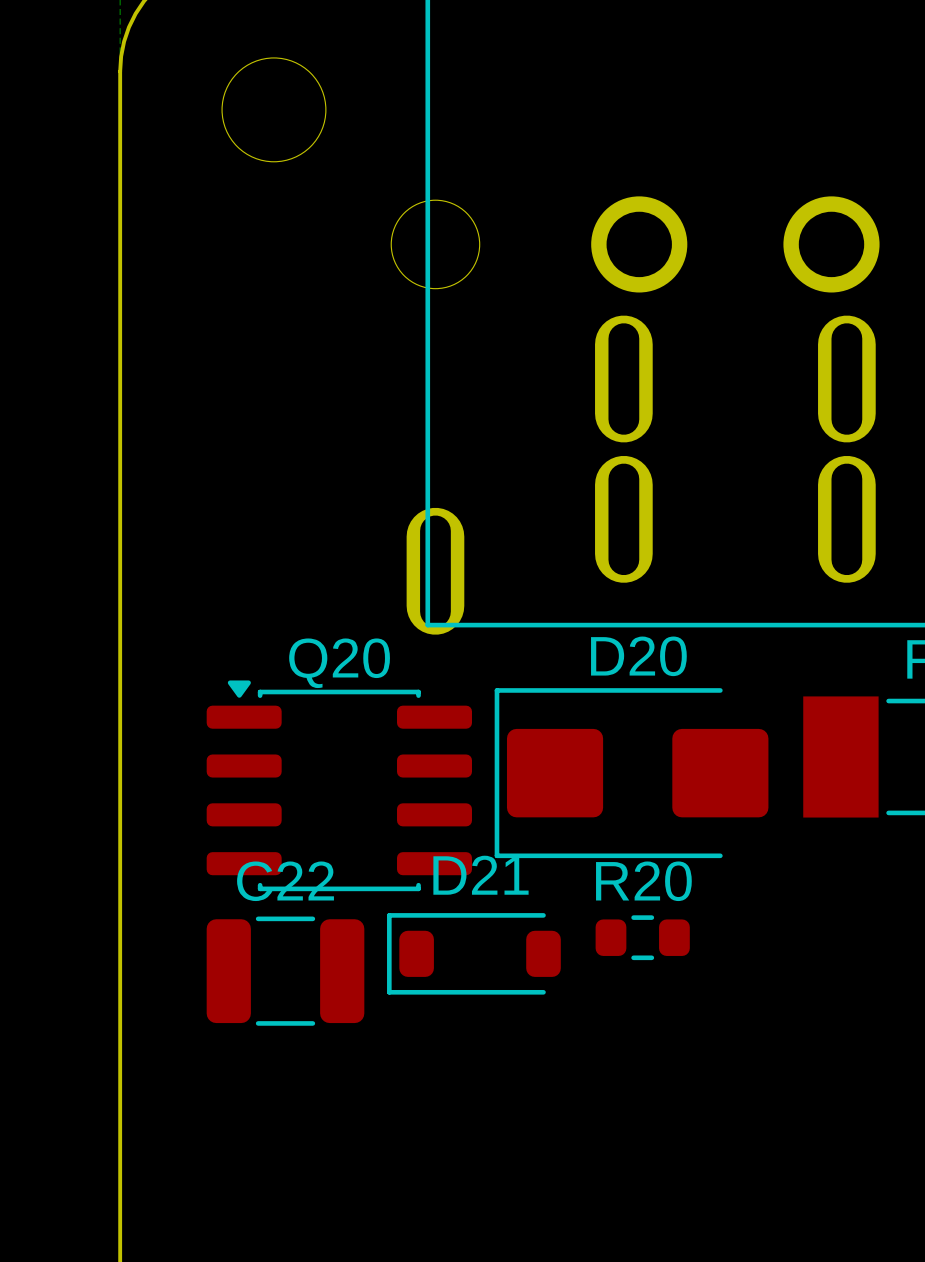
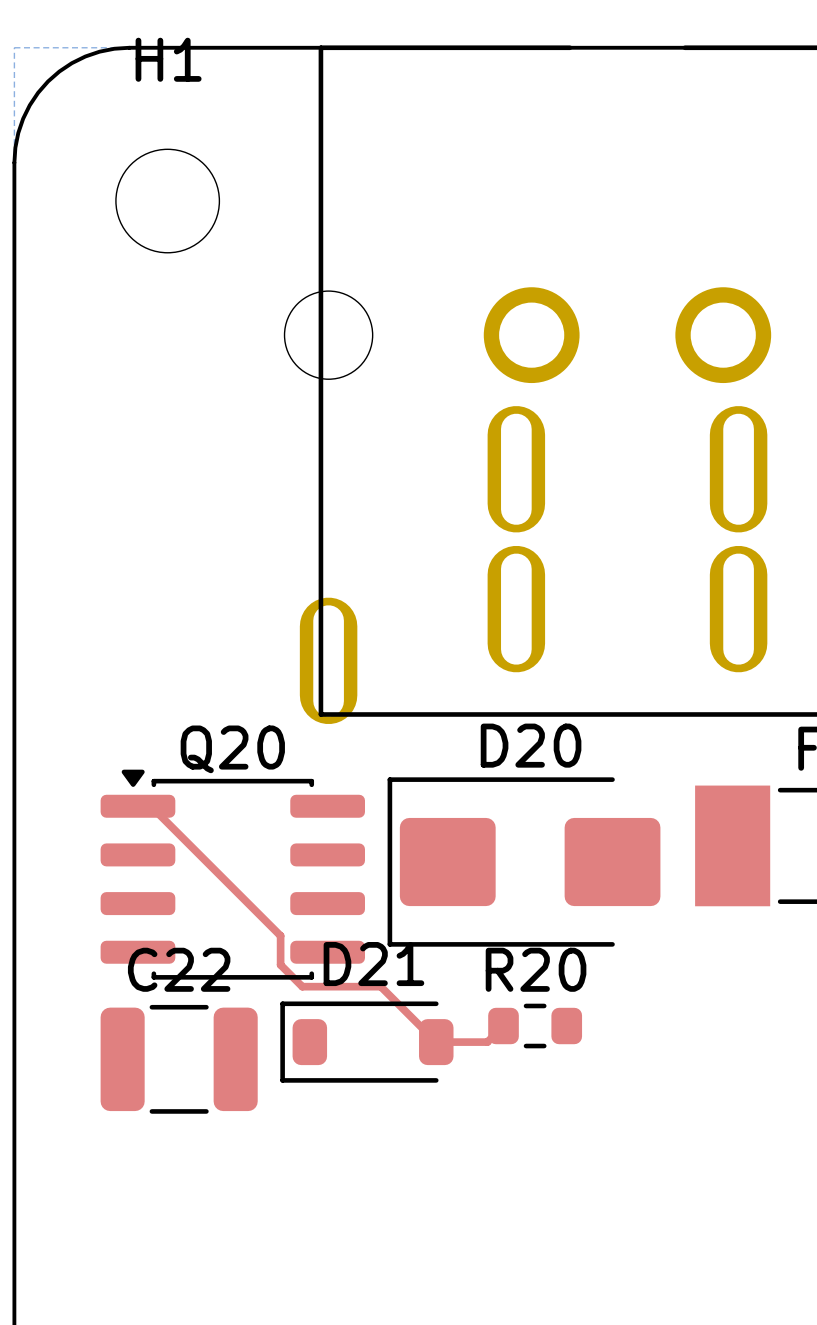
top track: none -> (137, 806) (151, 806) (280, 935) (280, 964) (302, 986) (380, 986) (436, 1042) (487, 1042) (503, 1026)

